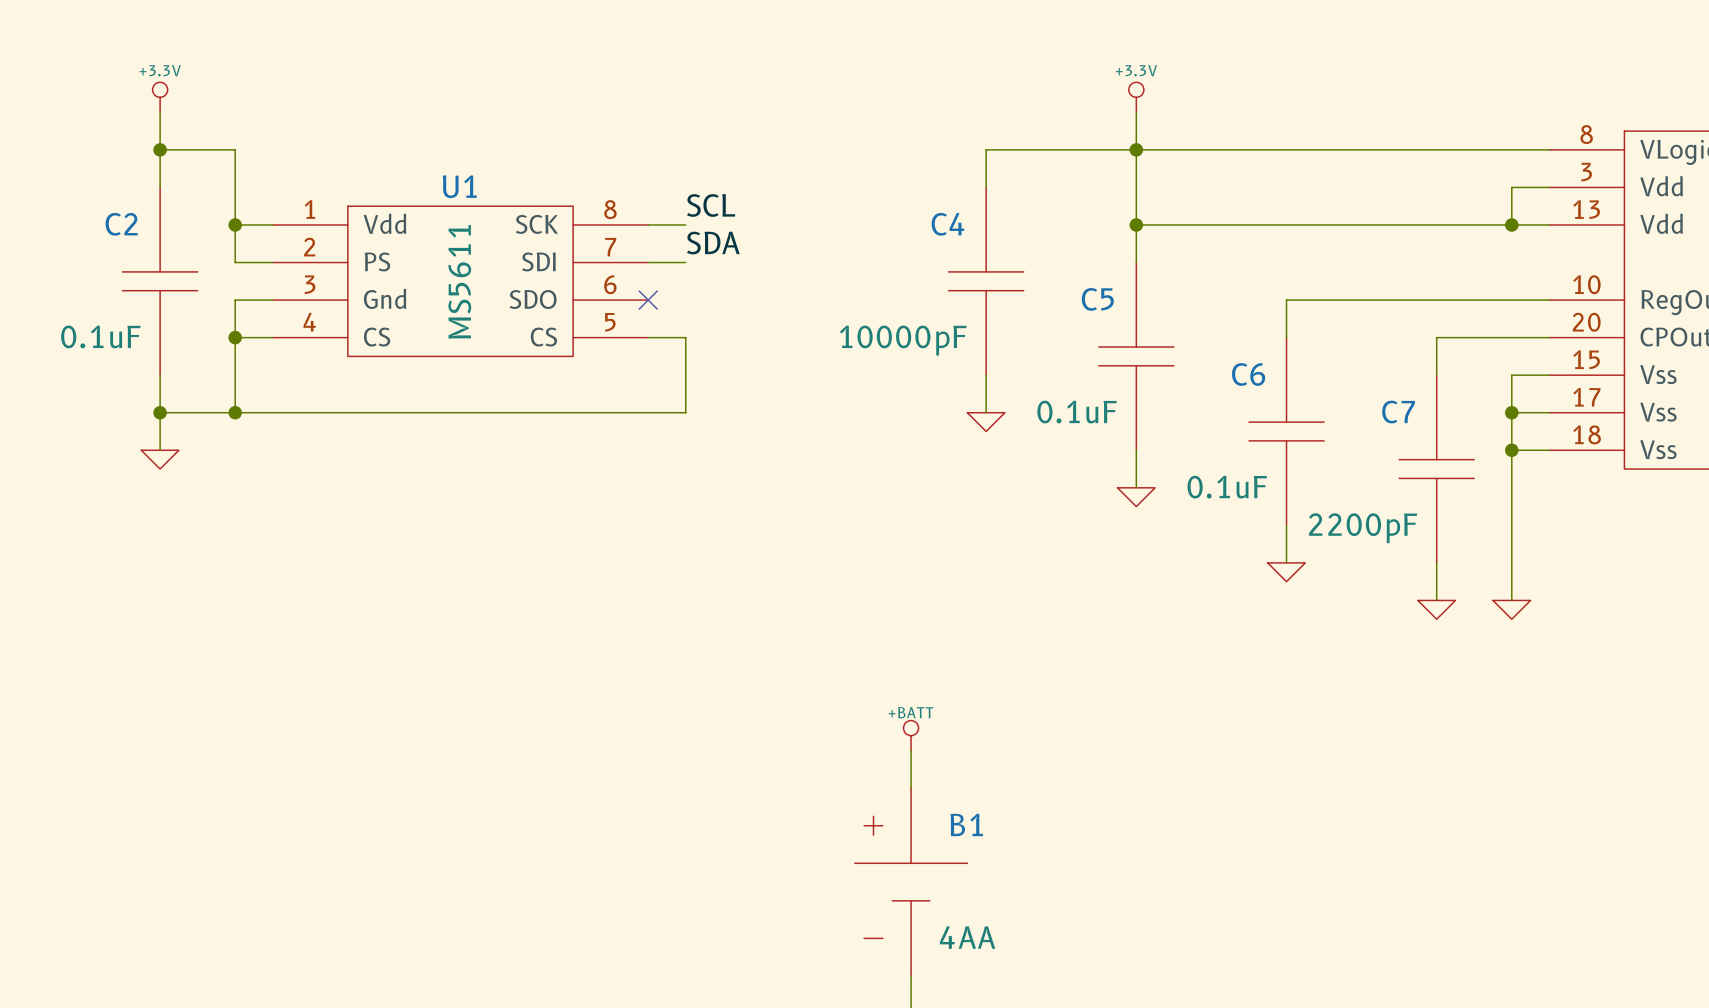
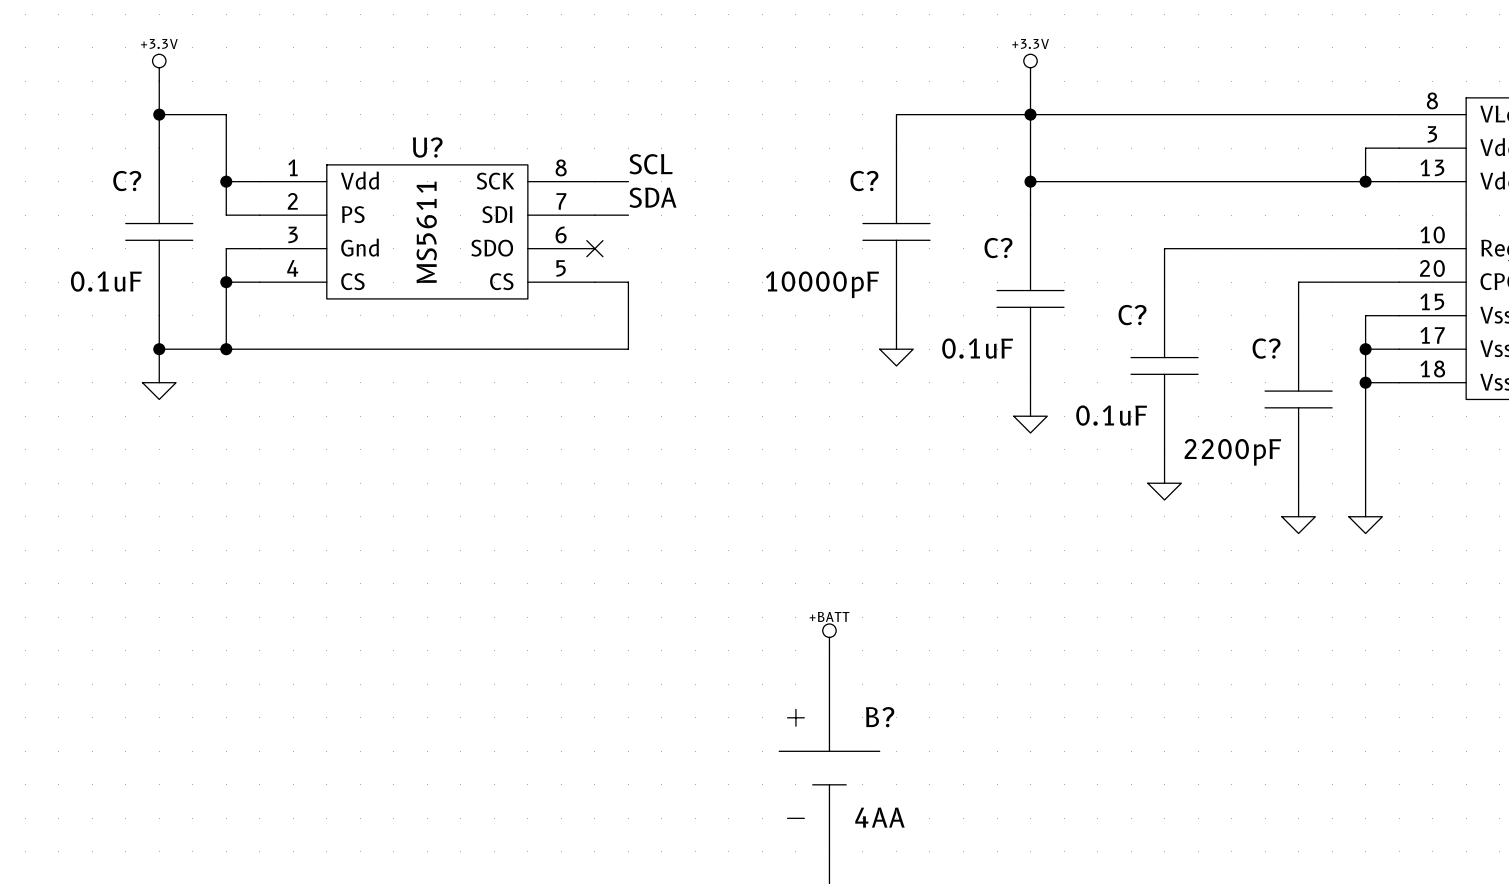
U1 name: U1 (459, 186) -> U? (427, 147)
C2 name: C2 (121, 224) -> C? (127, 181)
C4 name: C4 (948, 224) -> C? (864, 181)
C5 name: C5 (1097, 299) -> C? (998, 248)
C6 name: C6 (1248, 374) -> C? (1132, 315)
C7 name: C7 (1398, 412) -> C? (1266, 348)
B1 name: B1 (966, 824) -> B? (880, 717)

